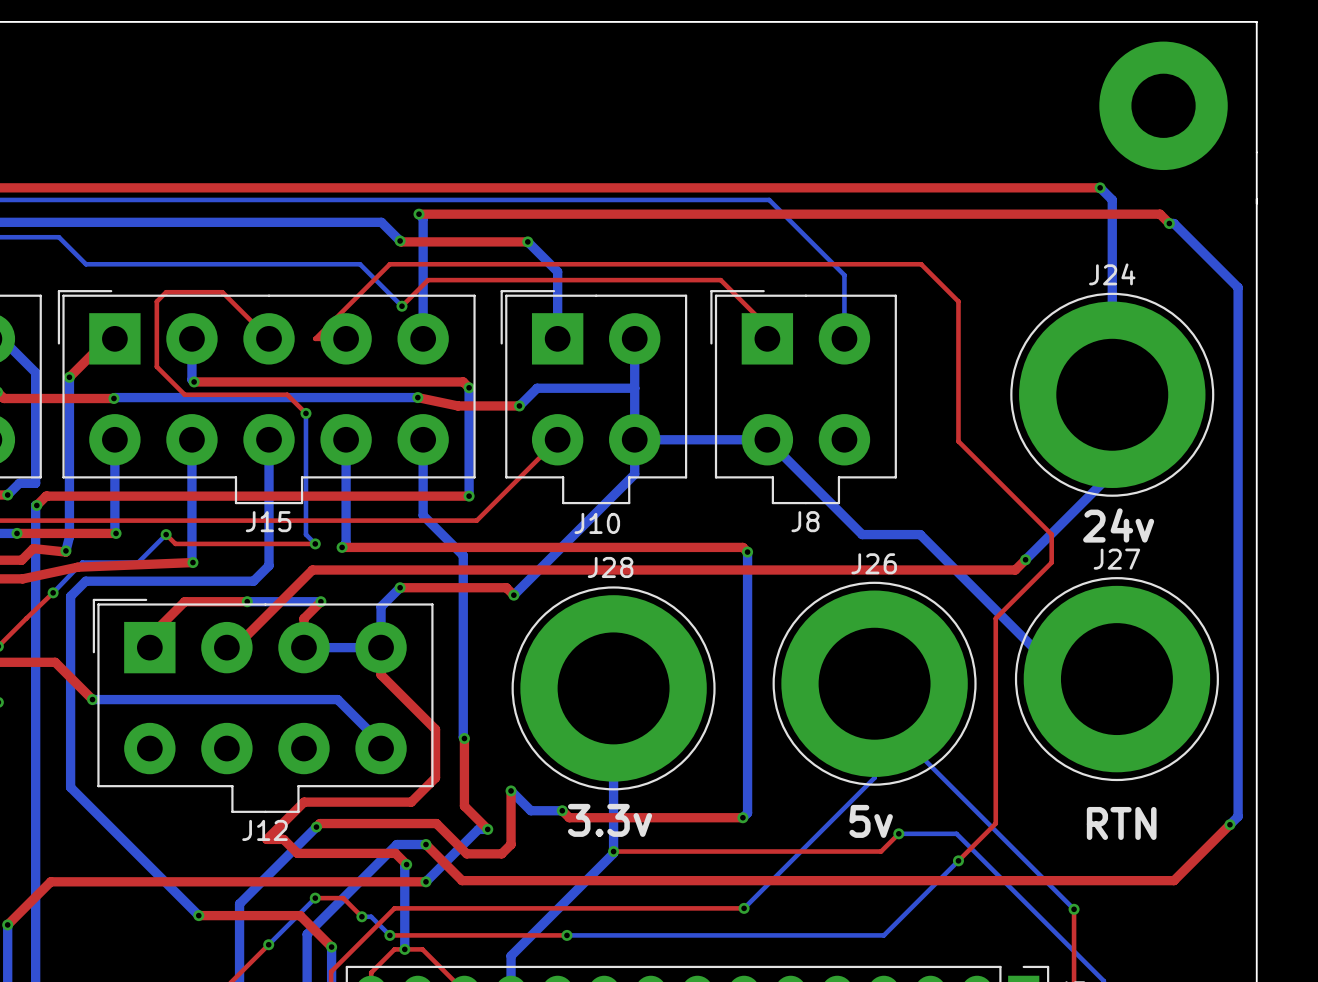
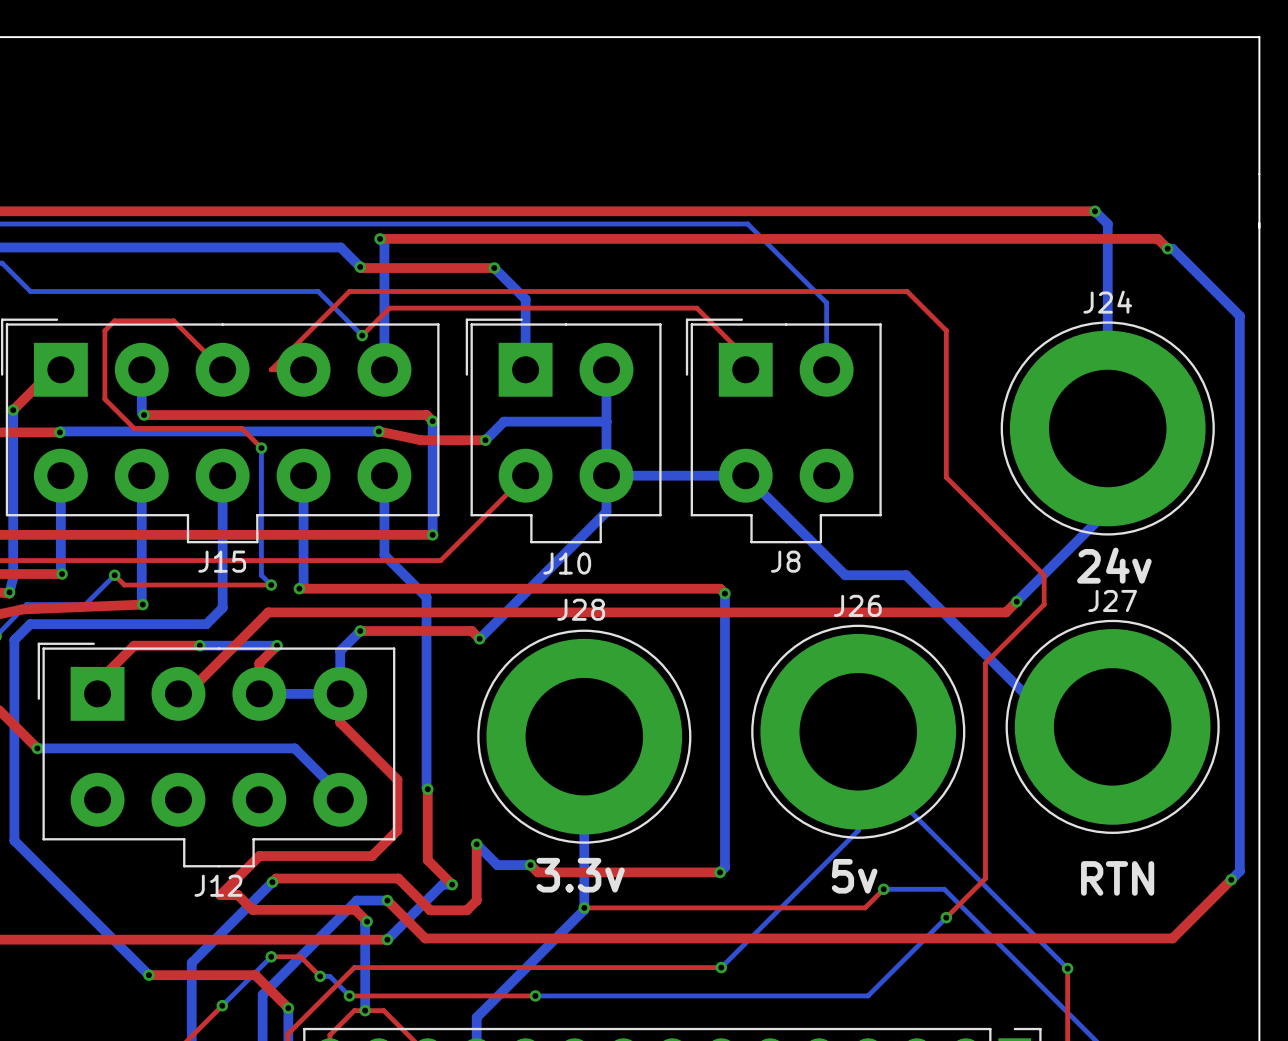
part: (1163, 105) -> none

